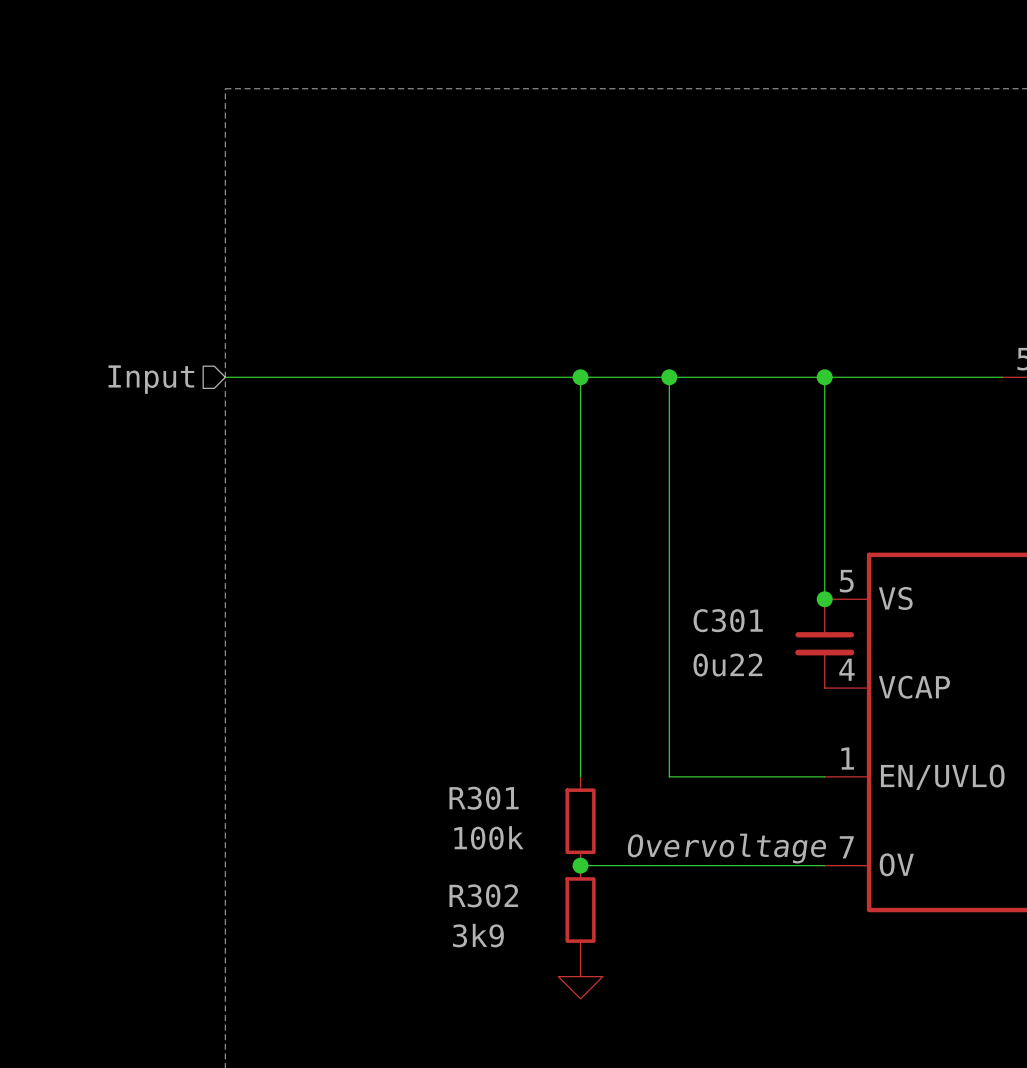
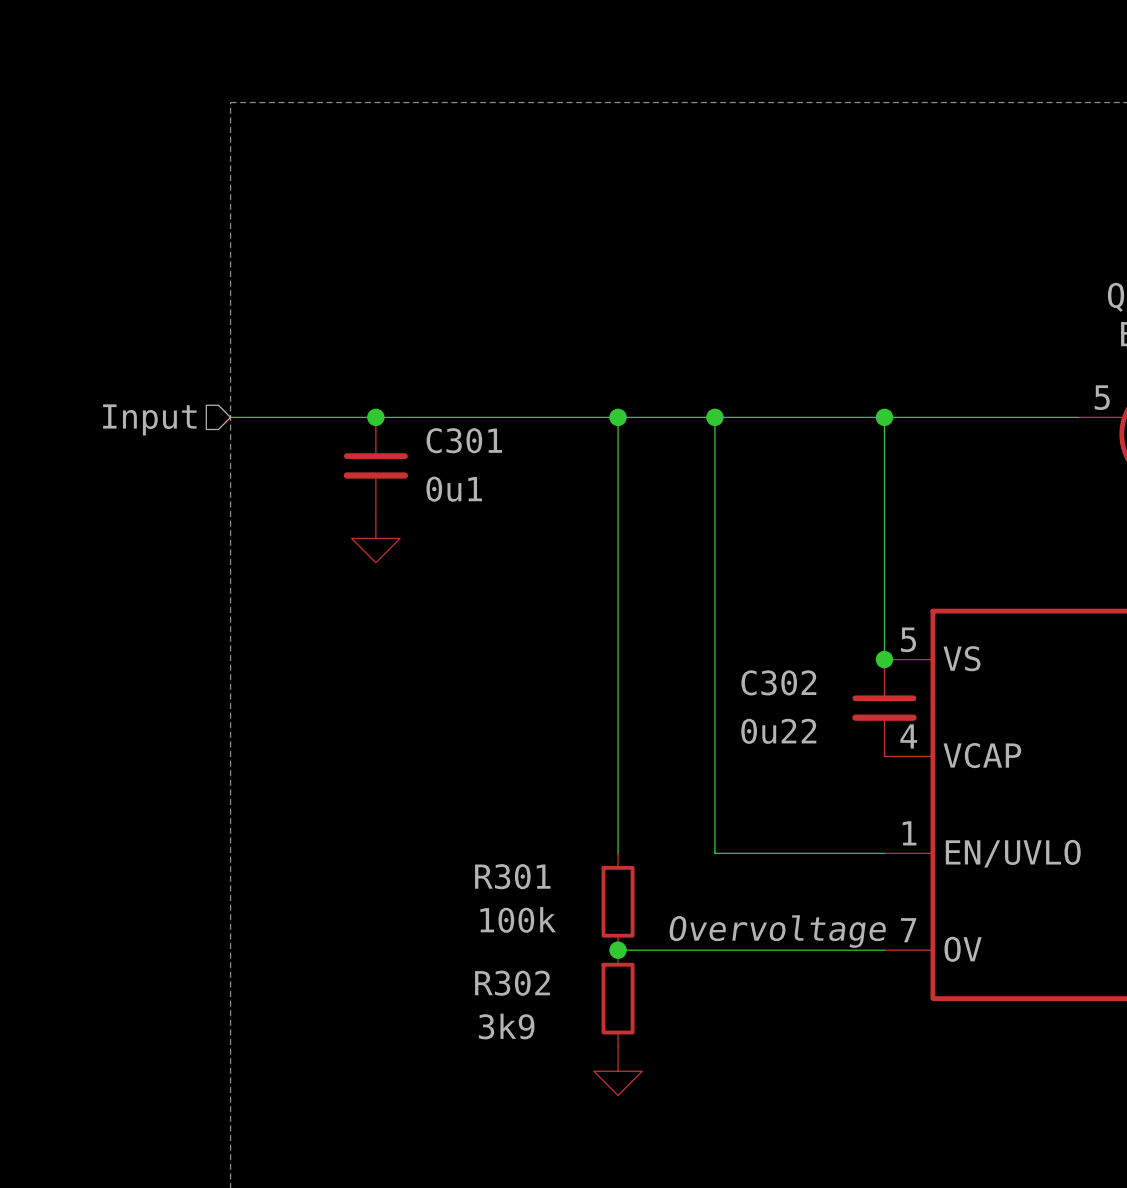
junction: none -> (375, 417)
C301: none -> 0u1 (375, 465)
power symbol: none -> (375, 538)
C301 name: C301 (728, 620) -> C302 (778, 682)

